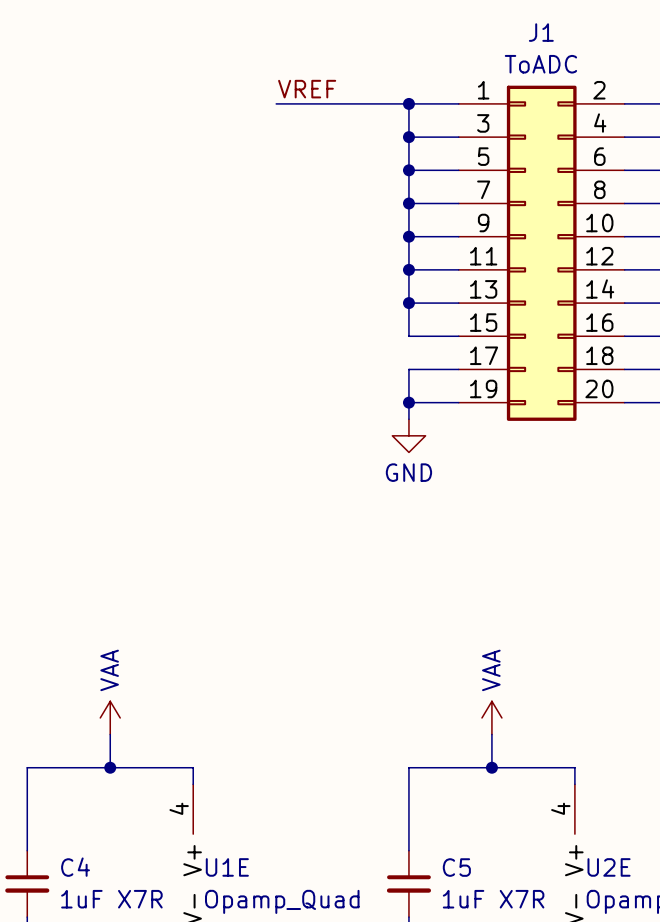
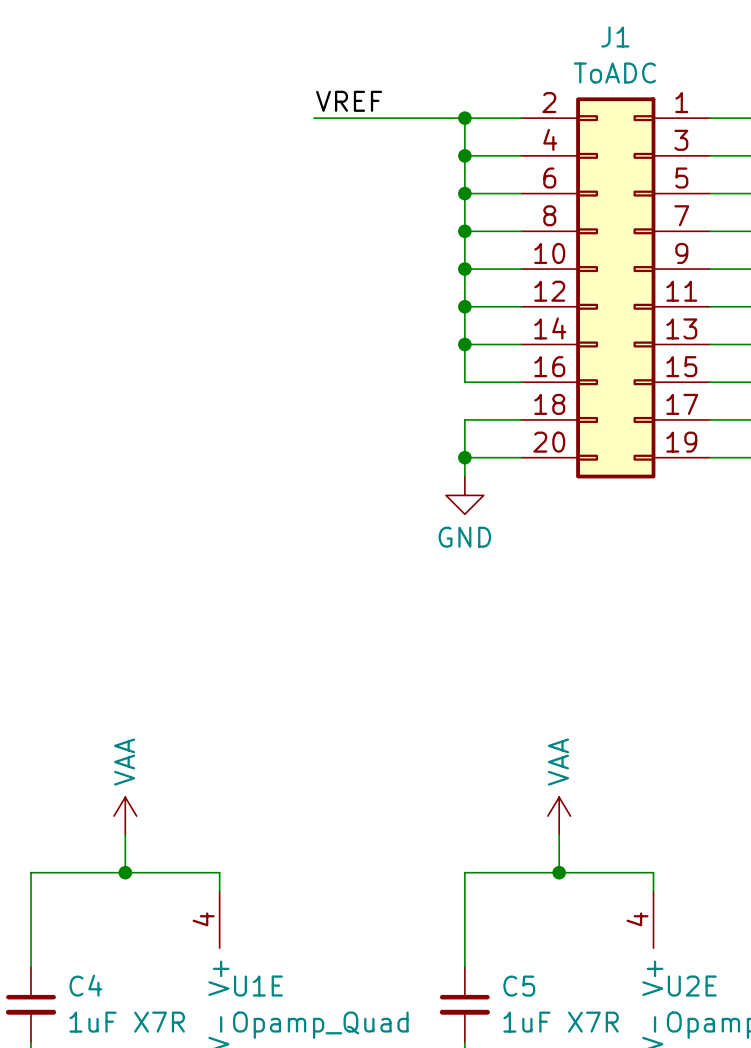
J1 flip: as is (541, 253) -> left-right (615, 287)

